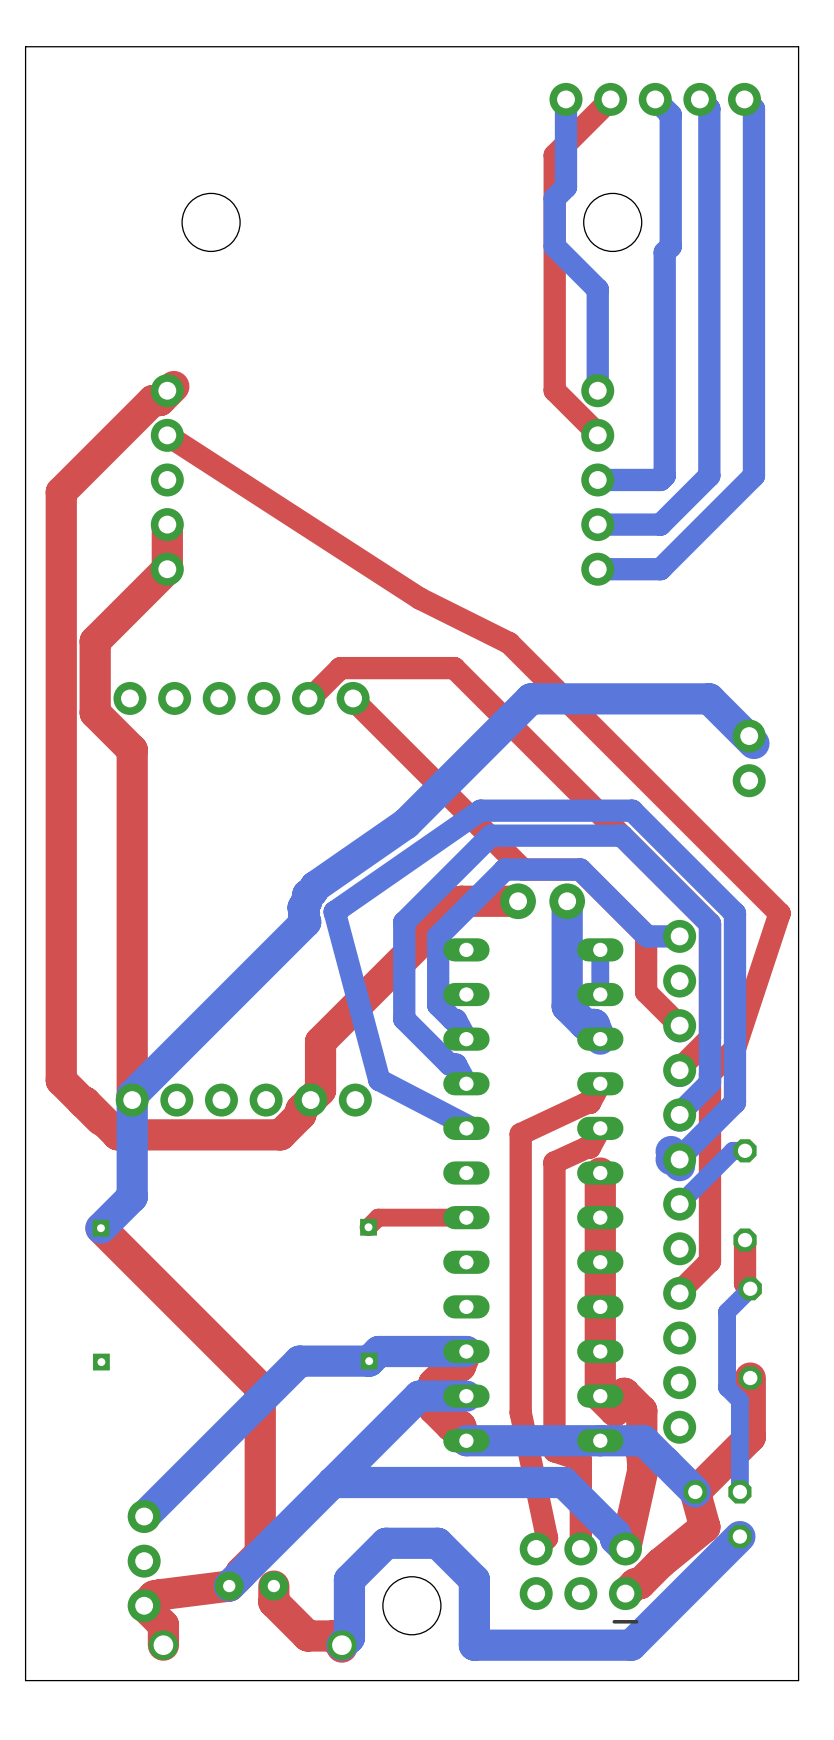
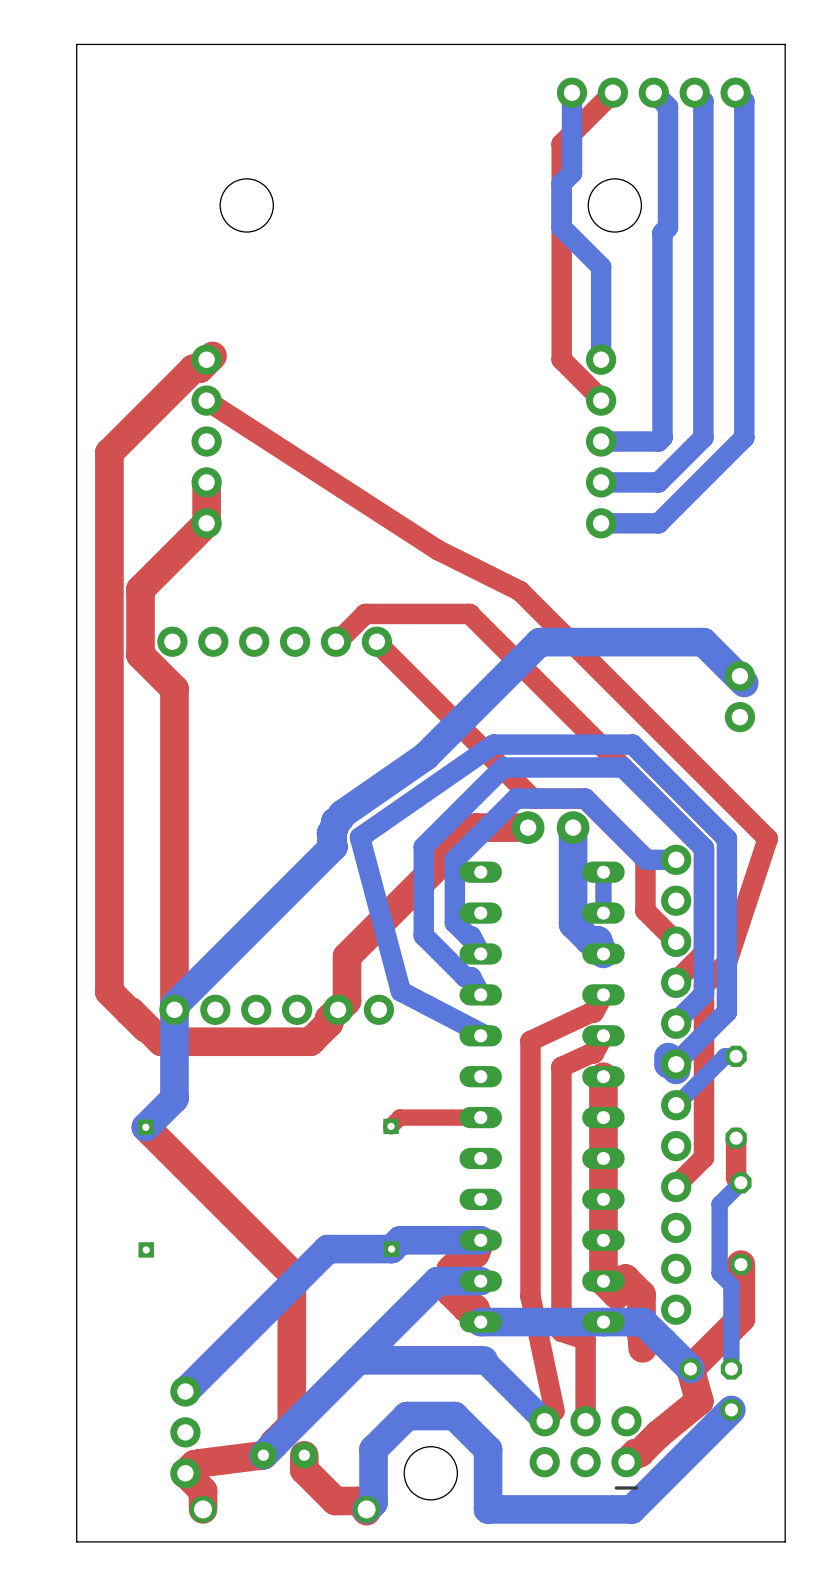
top track: (643, 1469) (625, 1548) -> none
bottom track: (469, 1482) (563, 1482) (615, 1534) (615, 1539) (625, 1548) -> (483, 1360) (544, 1421)

